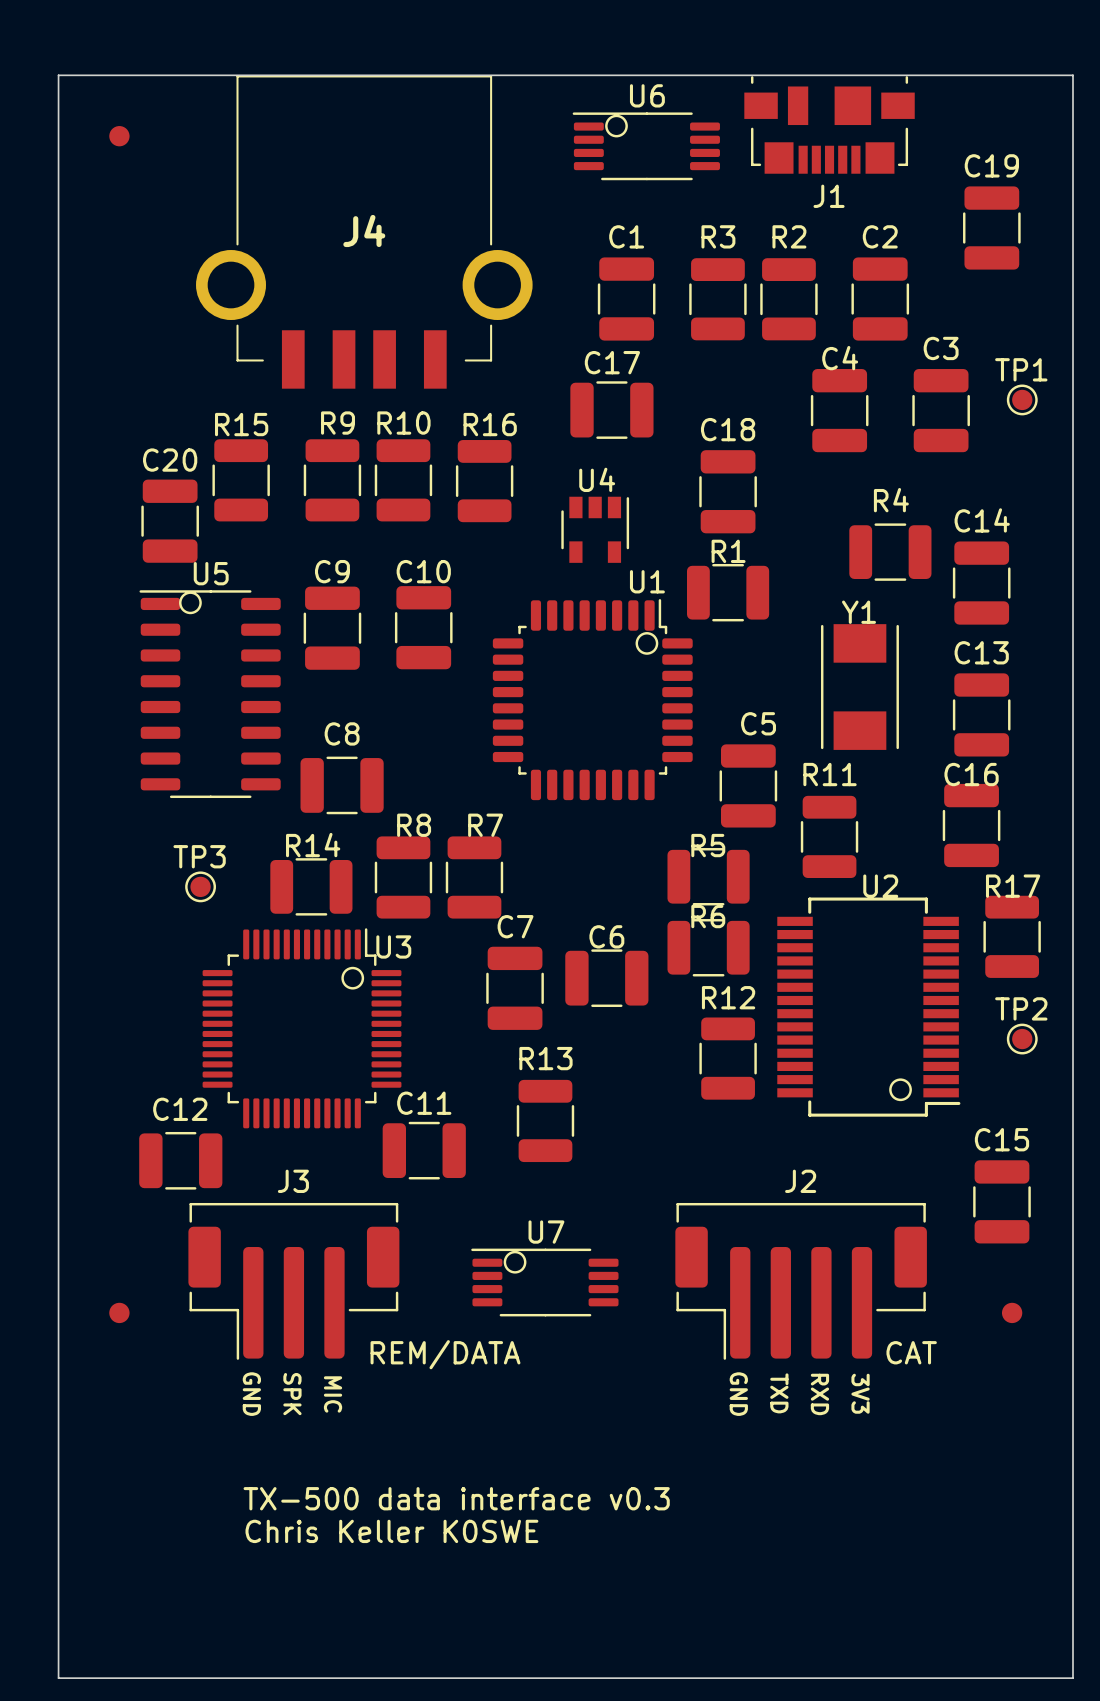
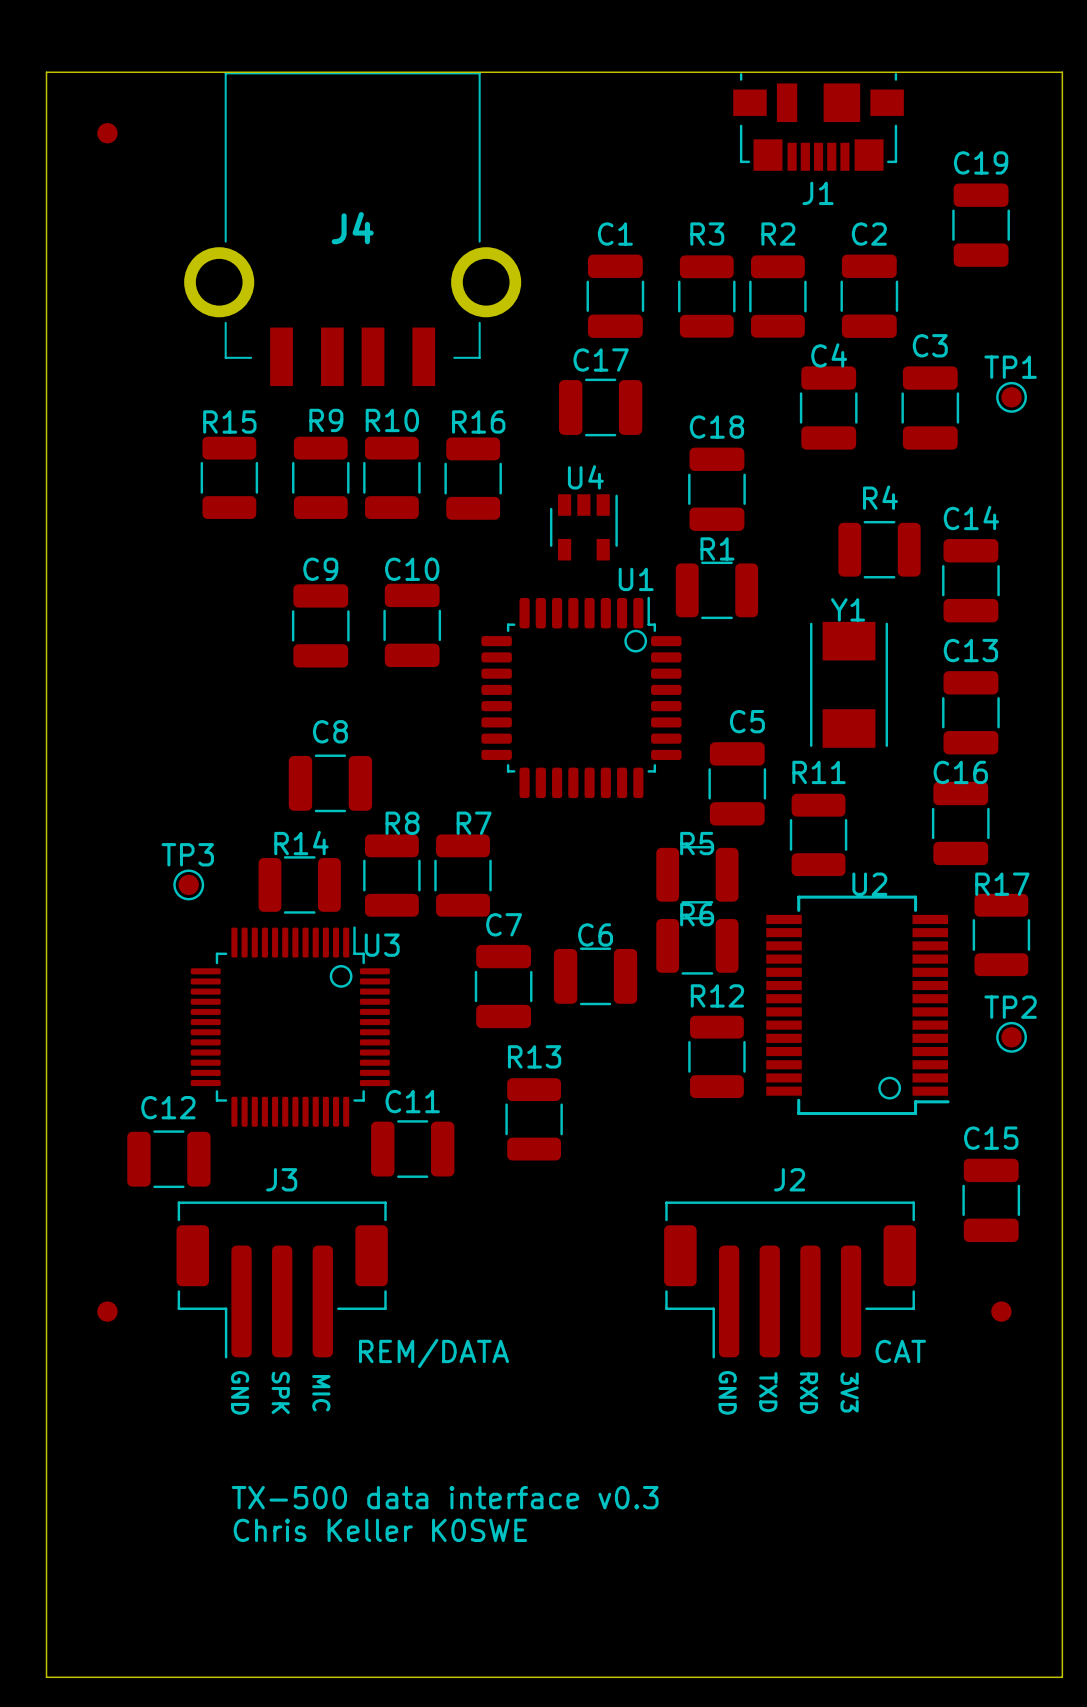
drawing: [605, 114, 628, 138] -> none
U6: (646, 146) -> none
C20: (170, 521) -> none
drawing: [179, 591, 202, 615] -> none
U5: (210, 694) -> none
drawing: [503, 1250, 527, 1274] -> none
U7: (544, 1282) -> none

